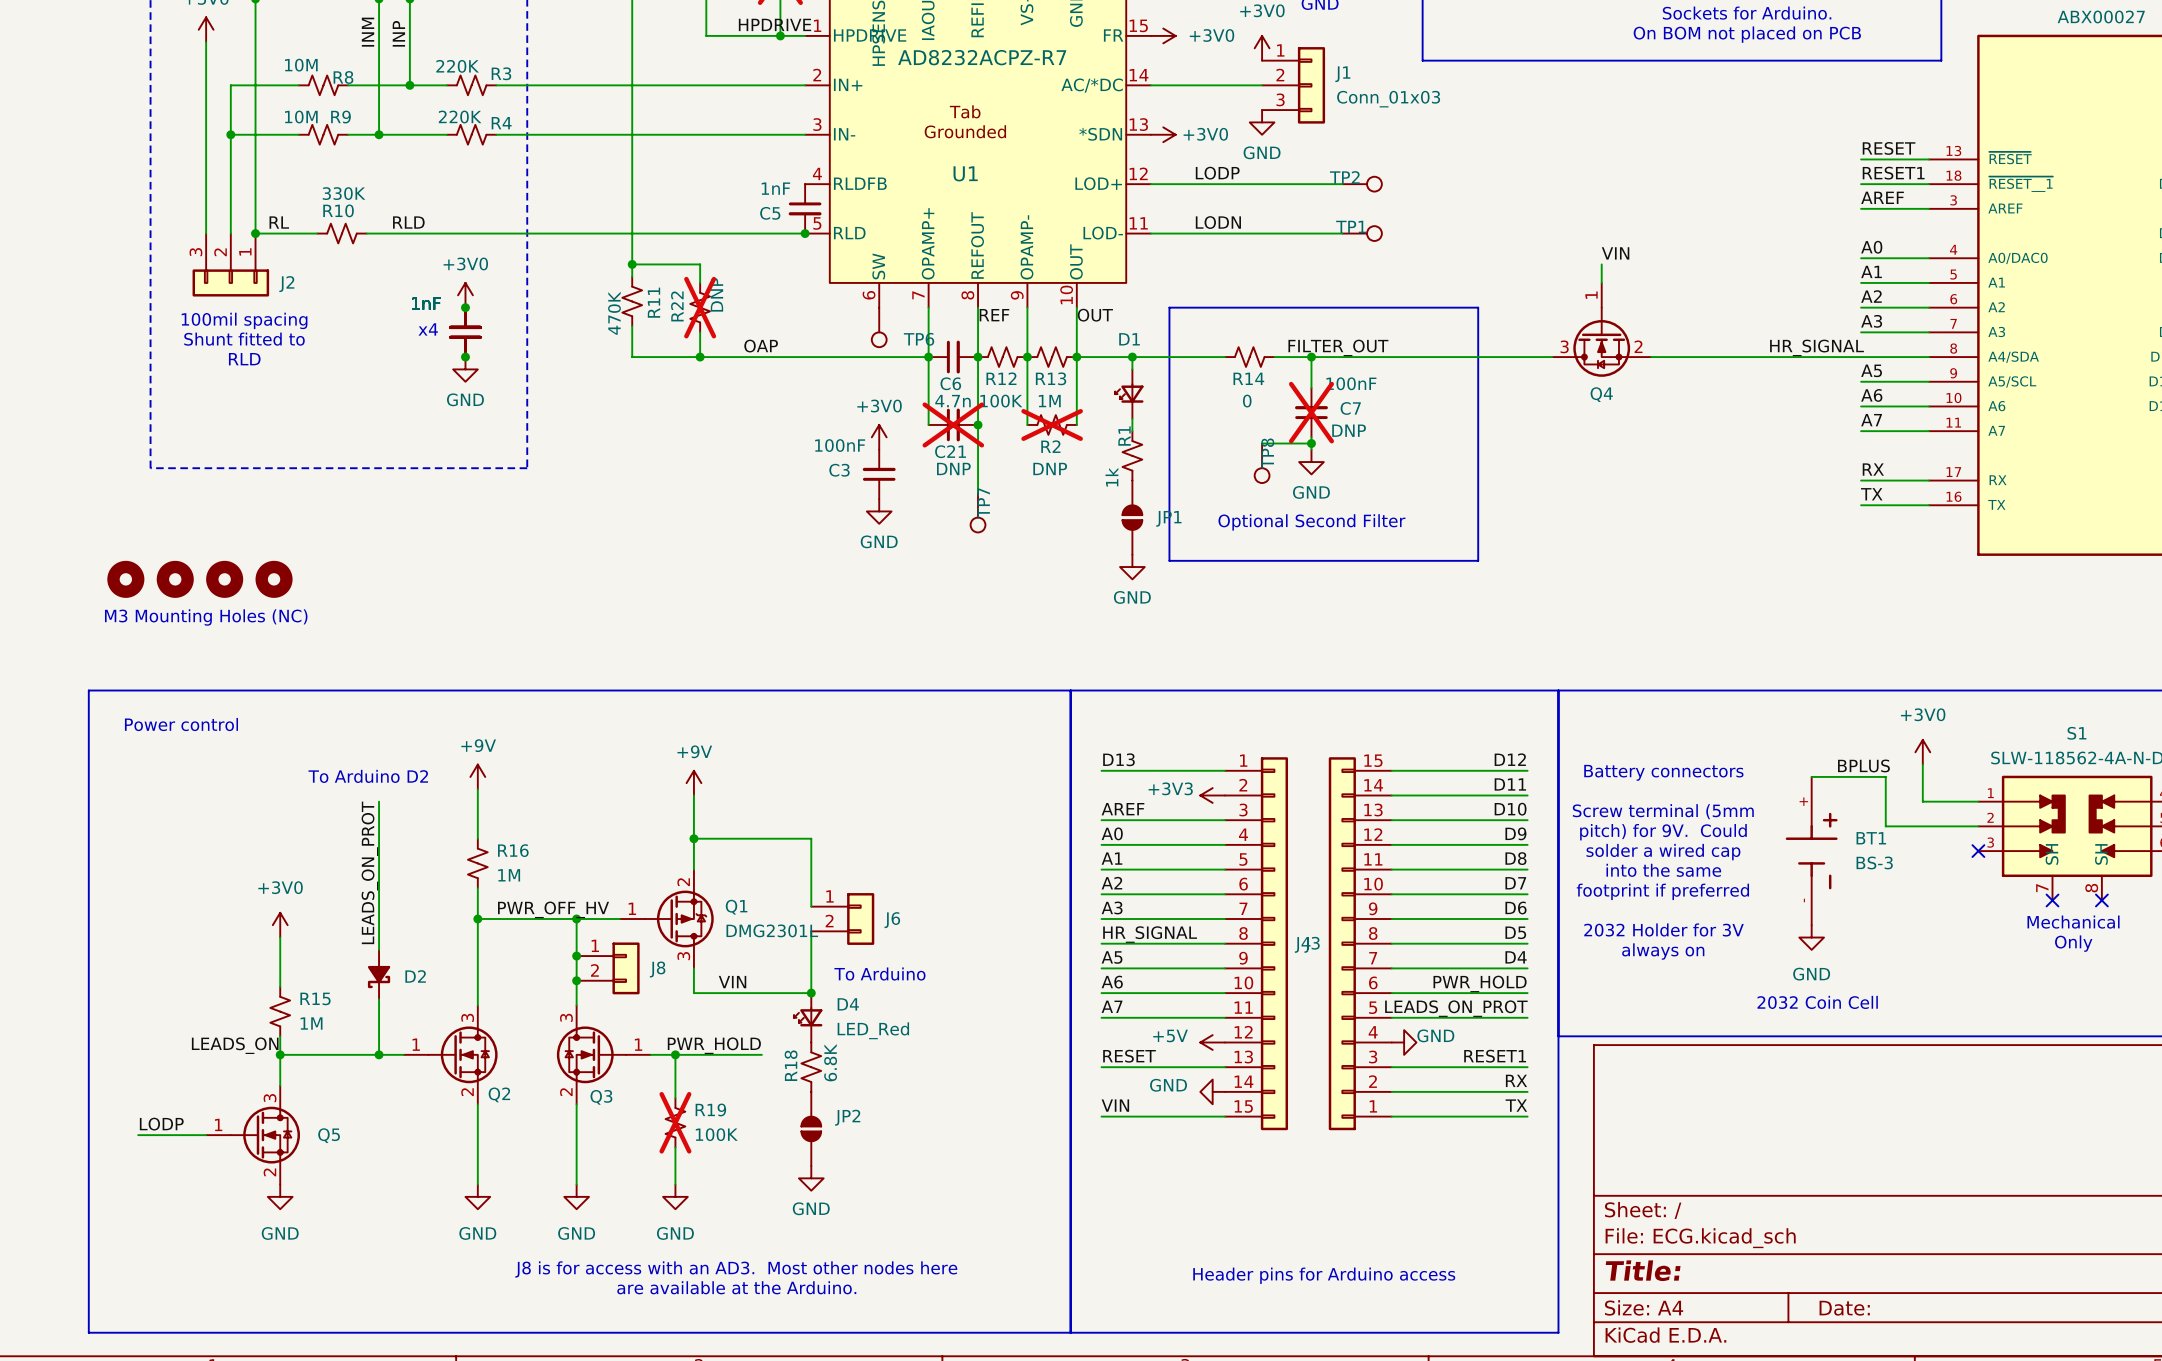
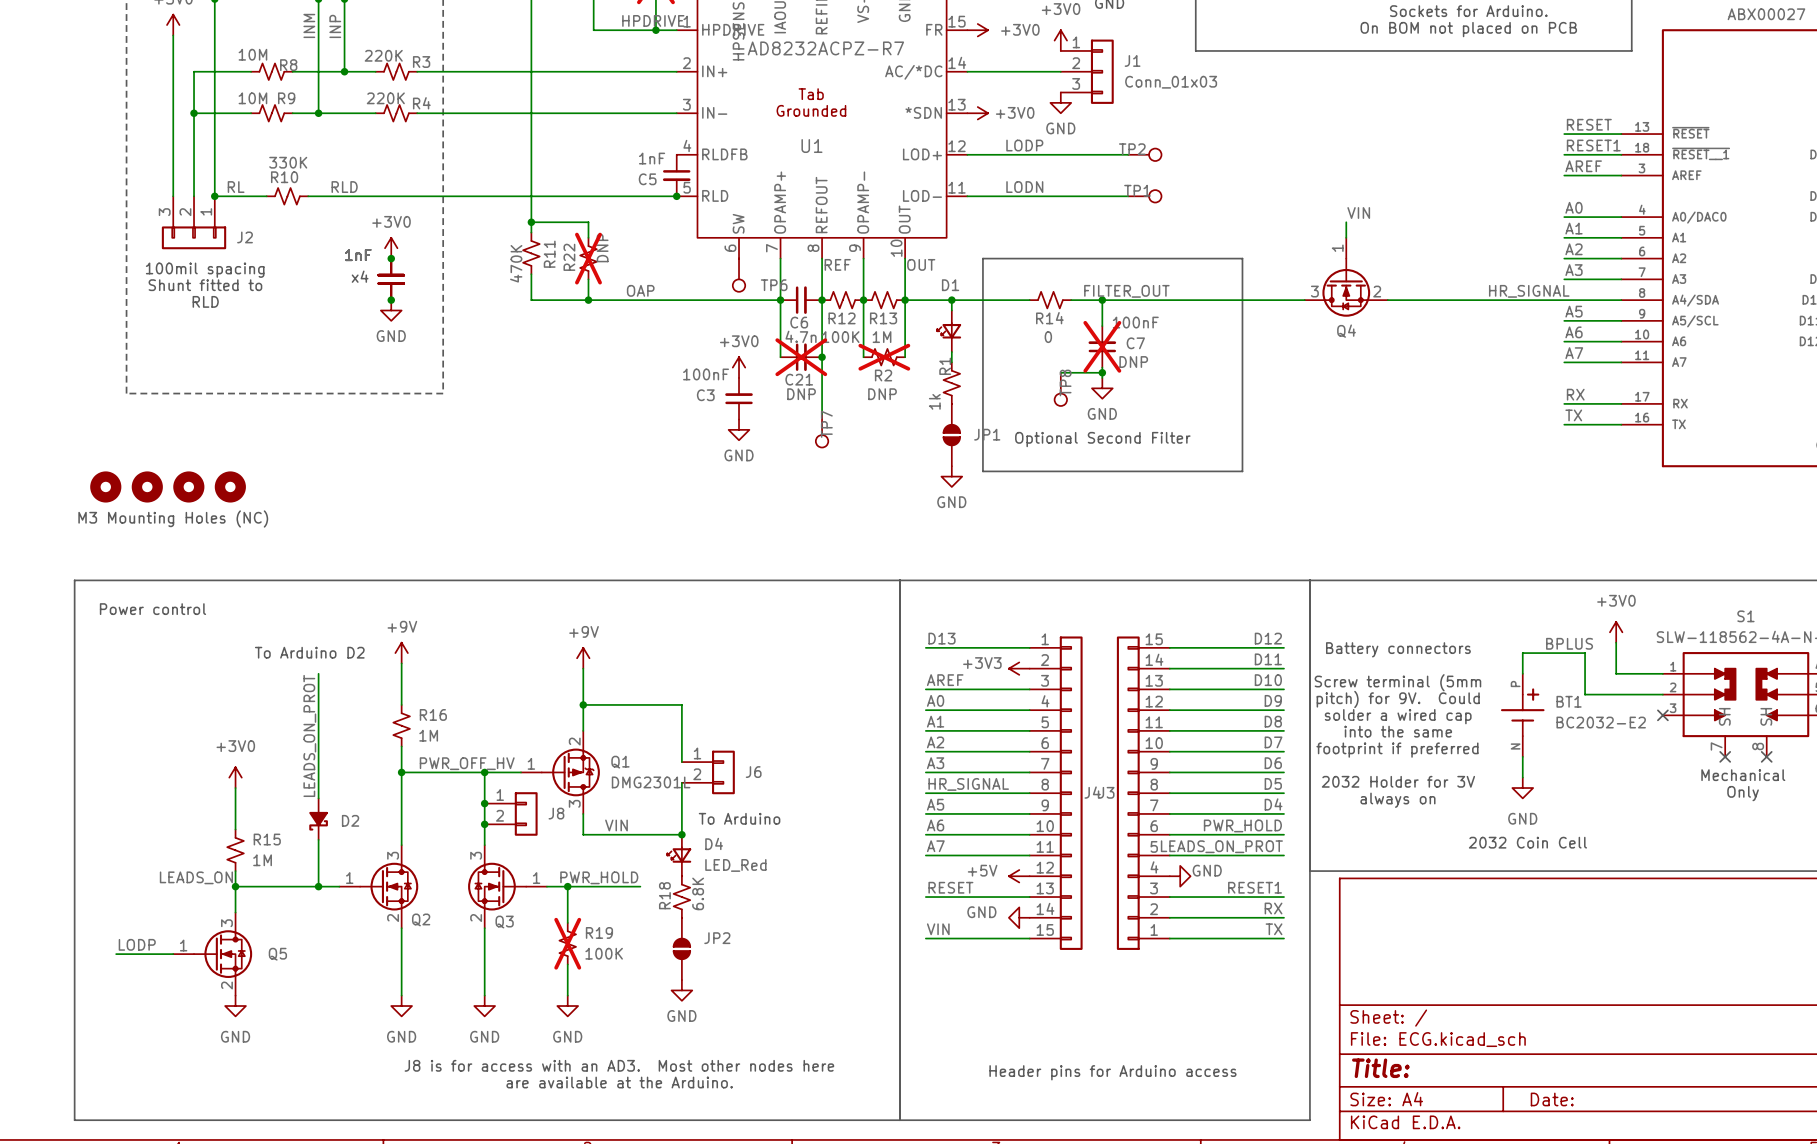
BT1 symbol: [1785, 776, 1838, 926] -> [1500, 673, 1545, 757]
BT1 value: BS-3 (1874, 862) -> BC2032-E2 (1601, 722)

